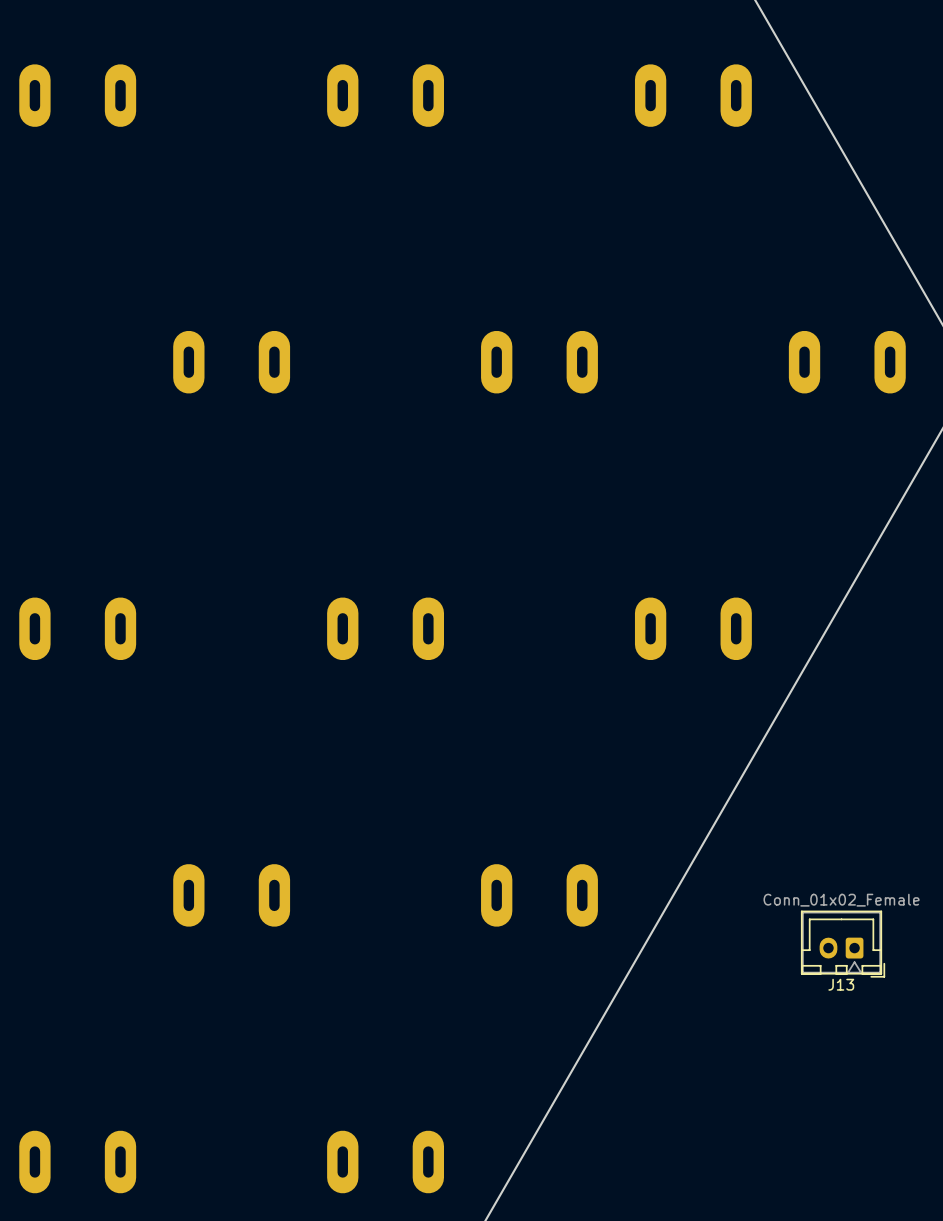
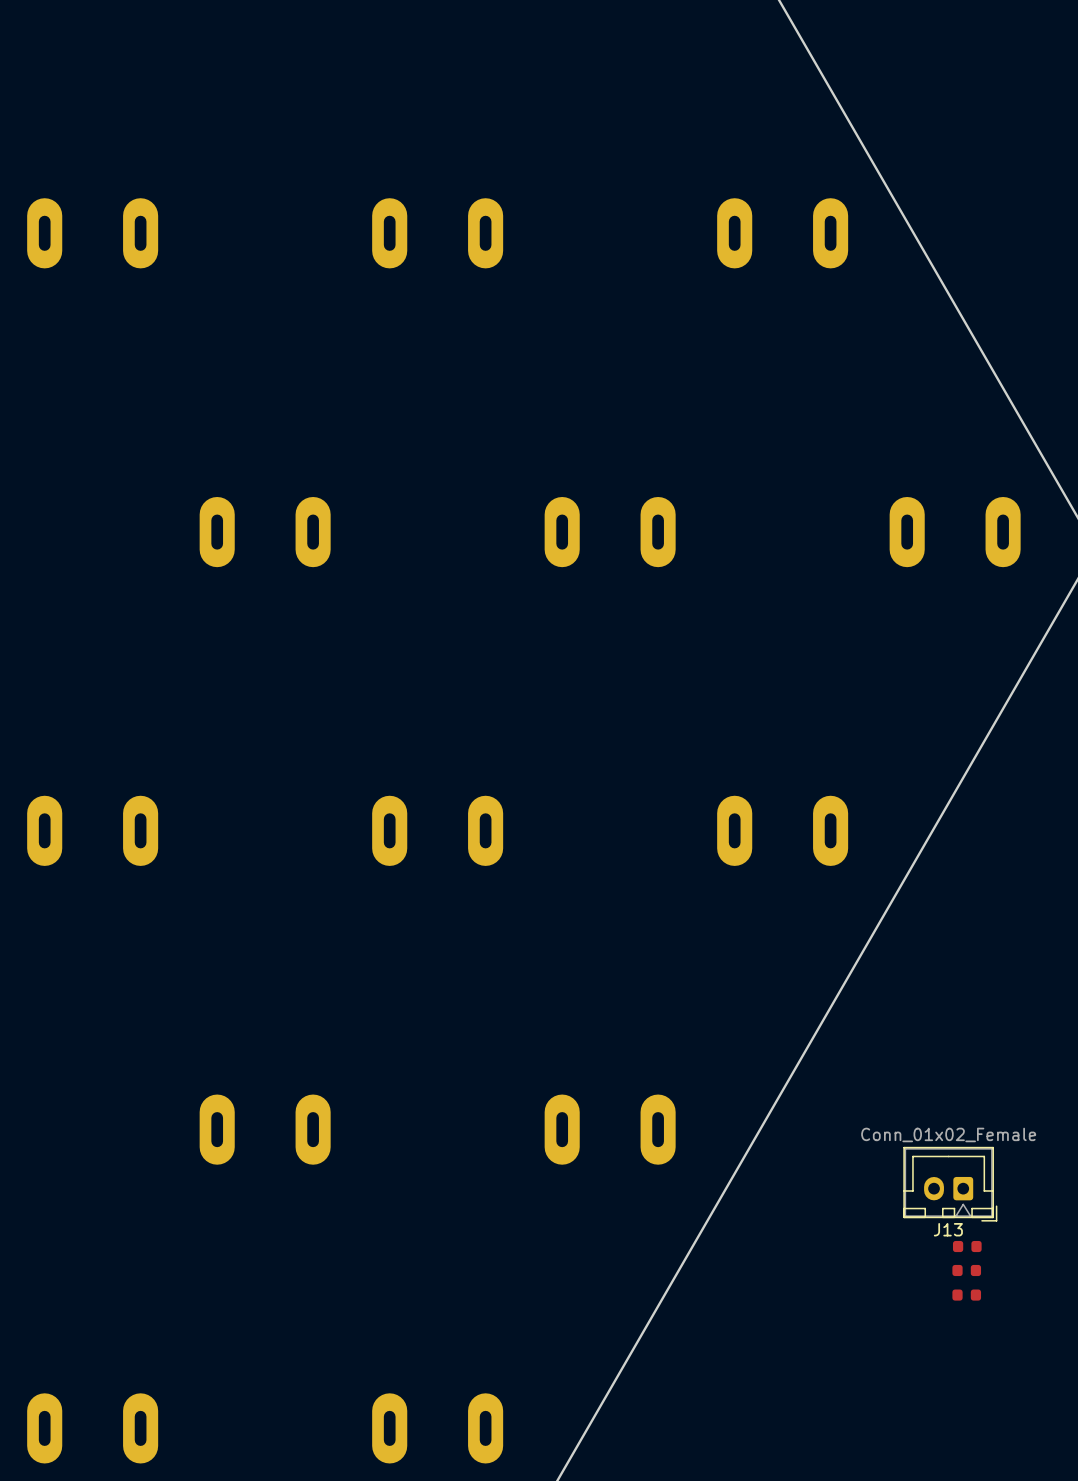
part: none -> (967, 1246)
part: none -> (966, 1270)
part: none -> (966, 1295)

